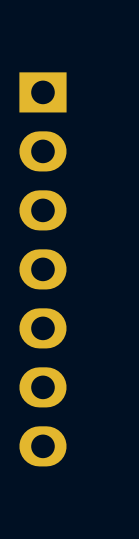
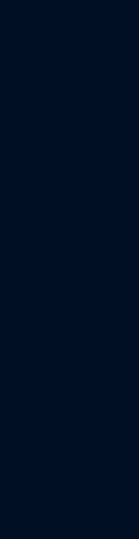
part: (42, 269) -> none

